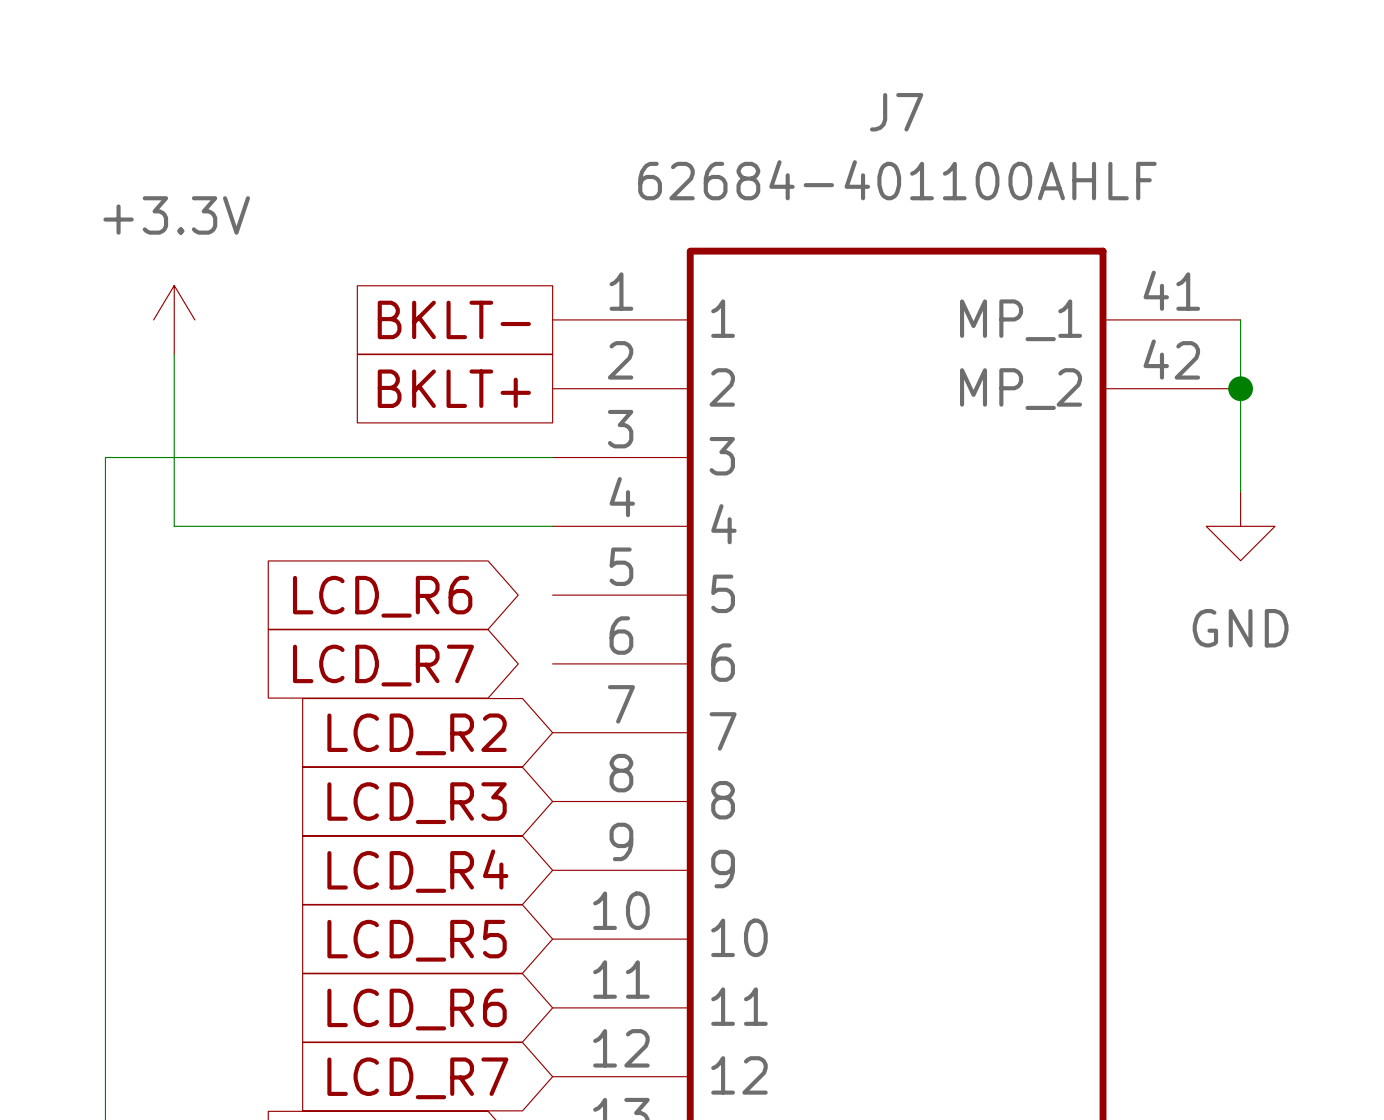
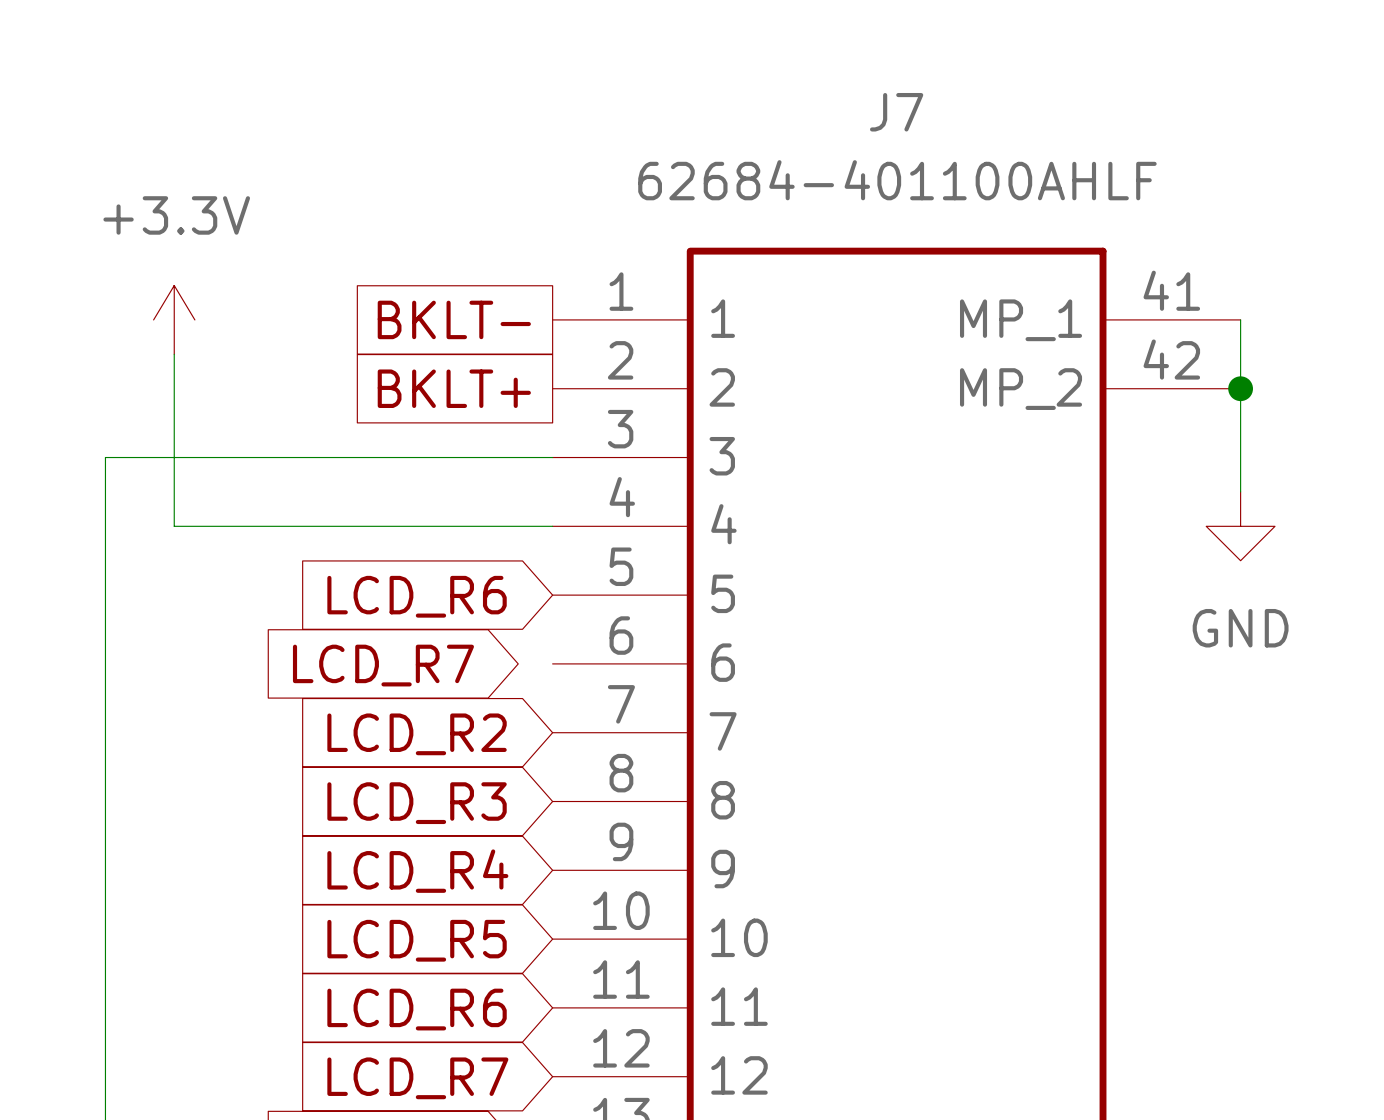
global label position: LCD_R6 (382, 596) -> LCD_R6 (417, 596)

